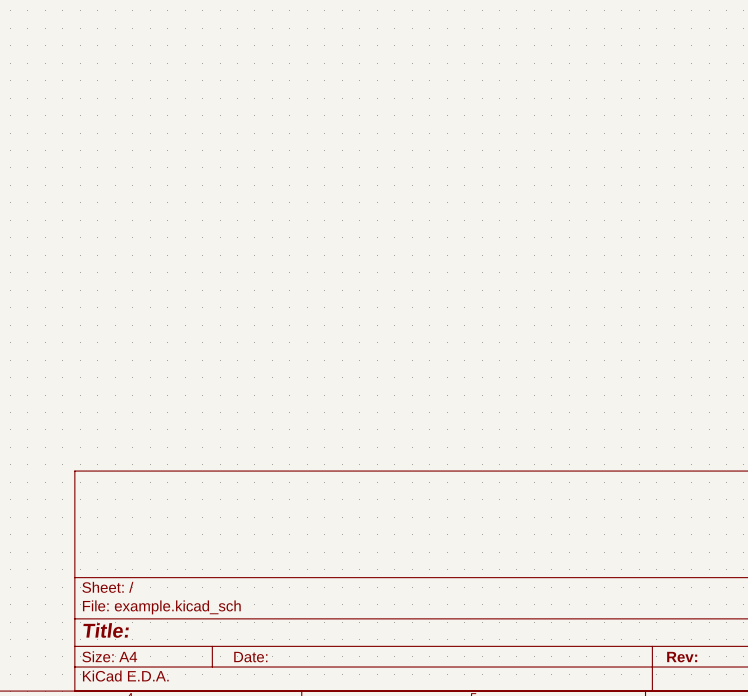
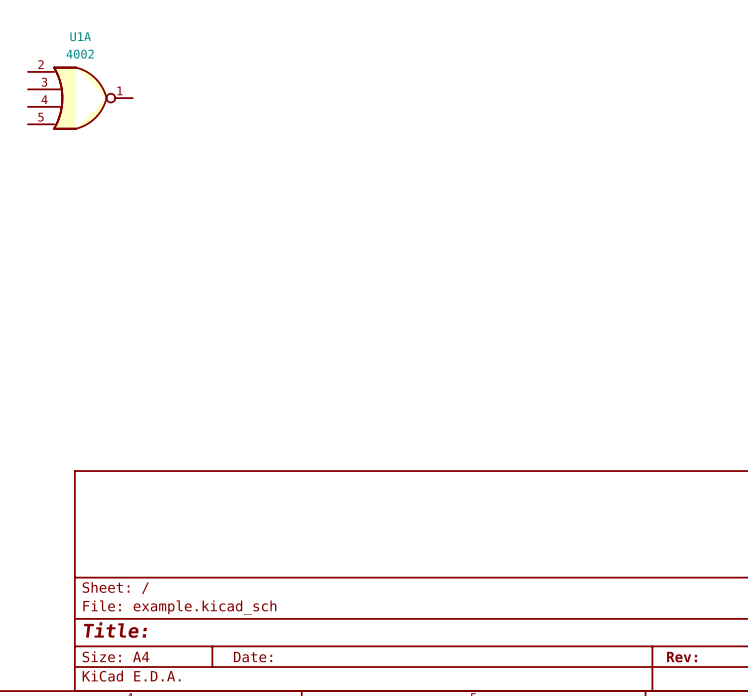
U1A: none -> 4002 (80, 98)

